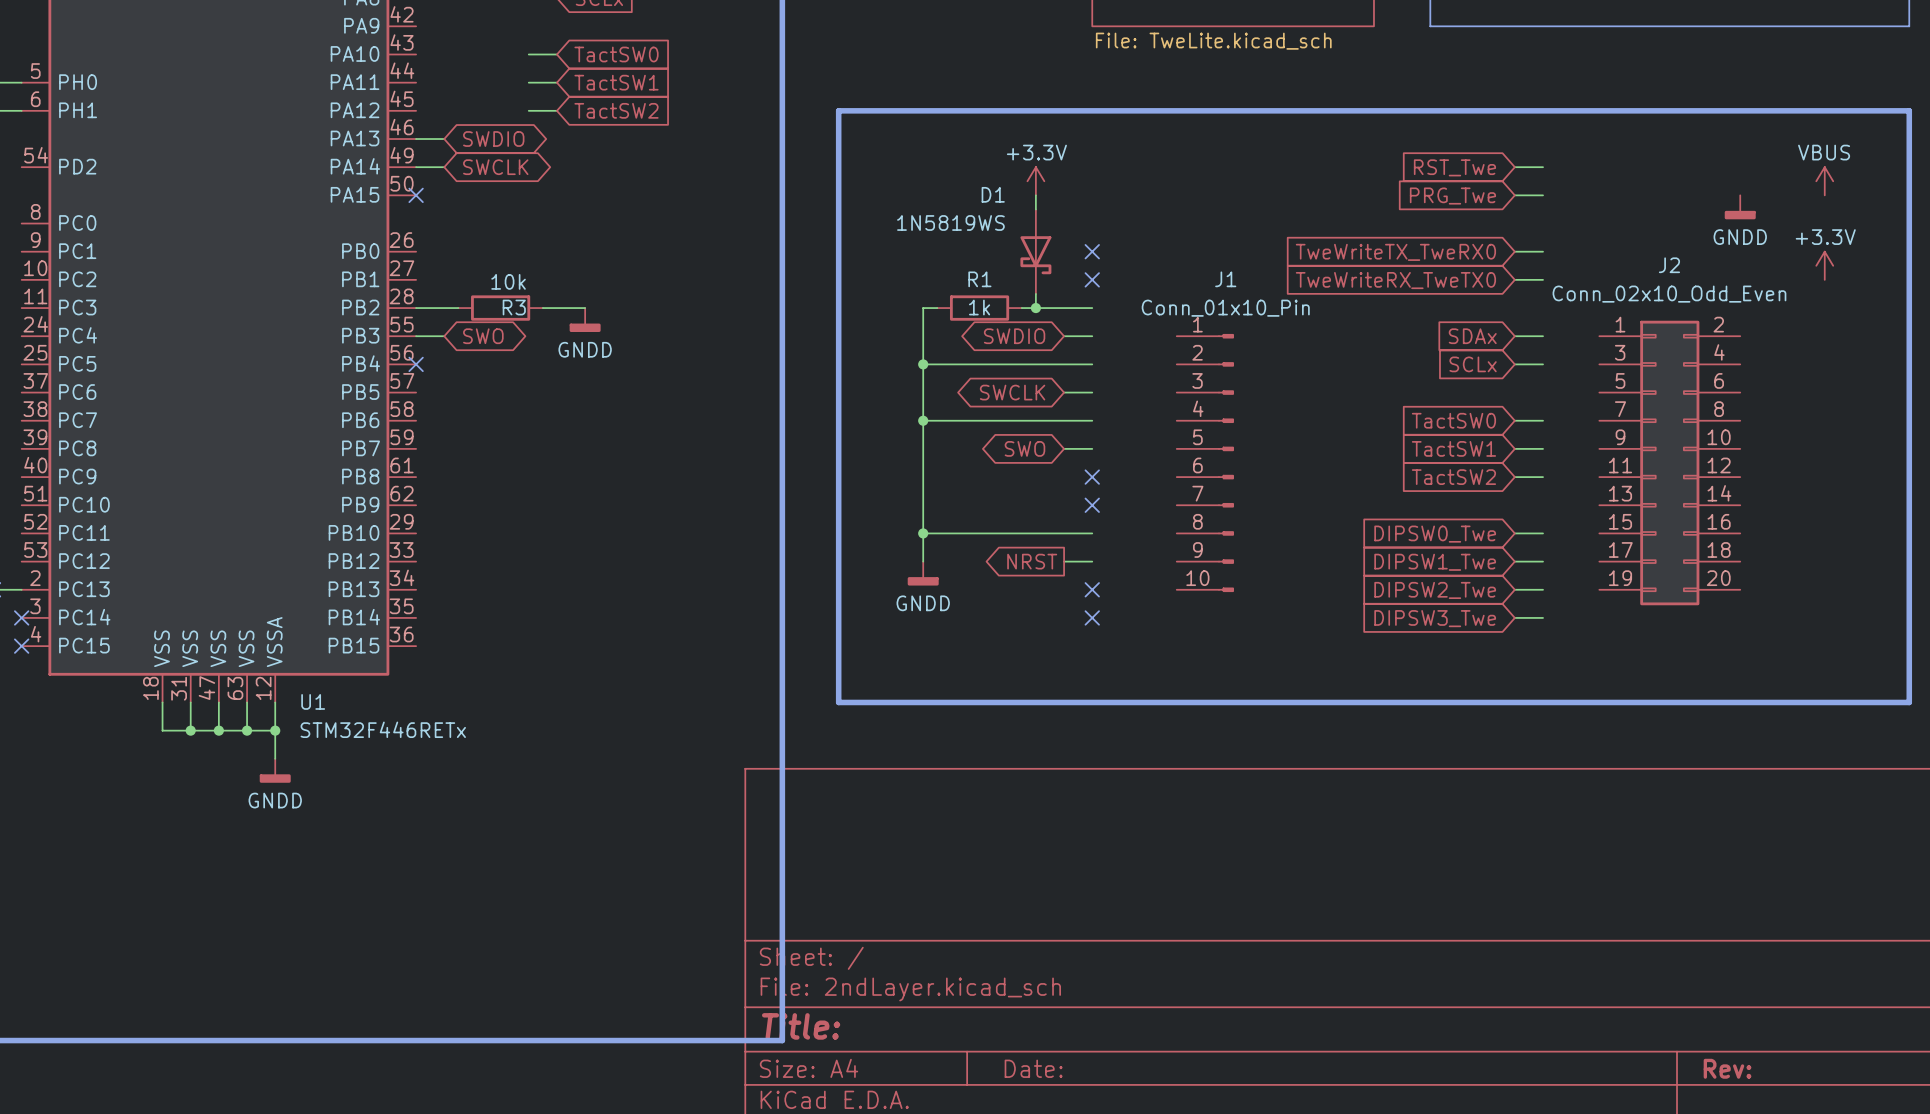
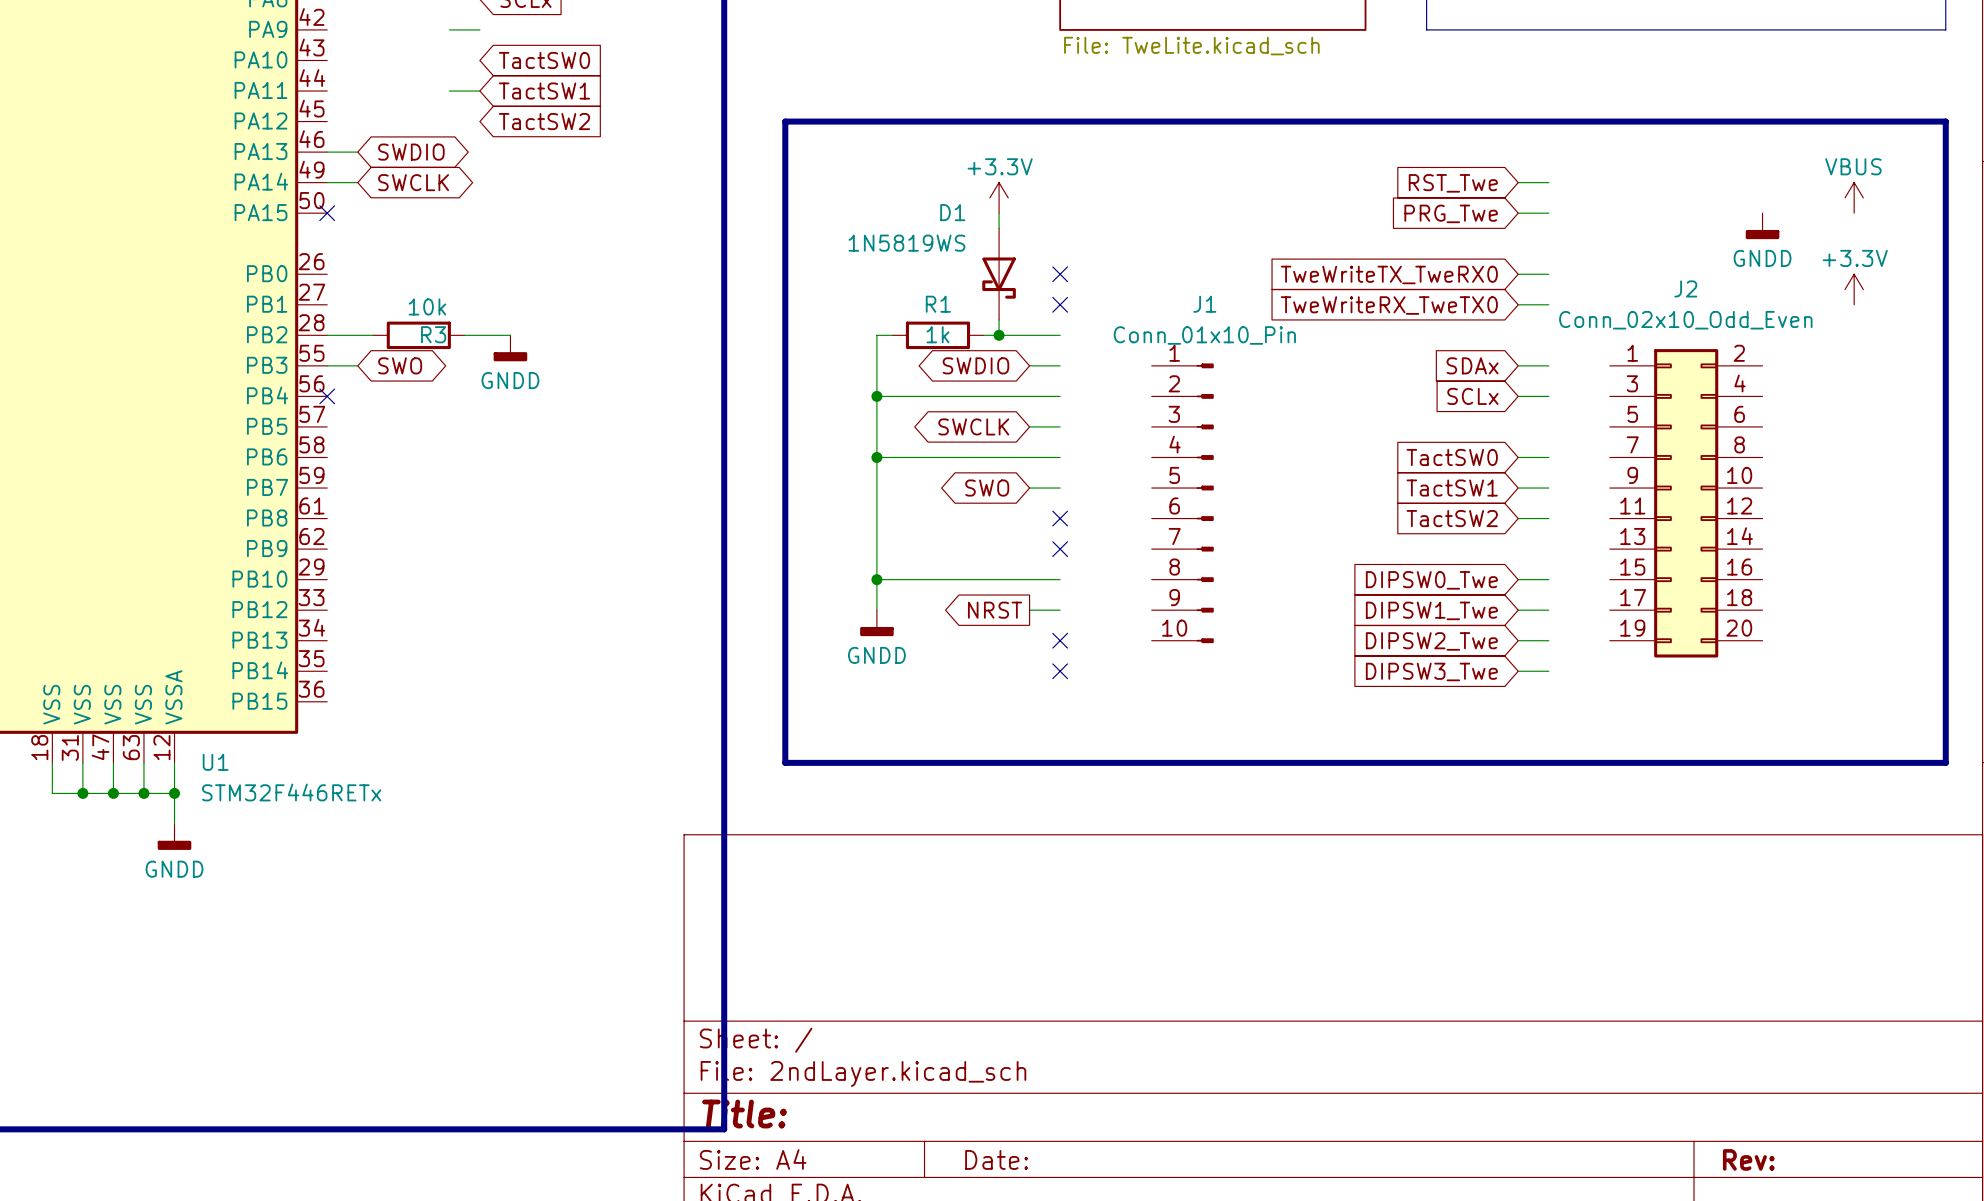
wire: (528, 54) (556, 54) -> (449, 29) (479, 29)
wire: (528, 110) (556, 110) -> none

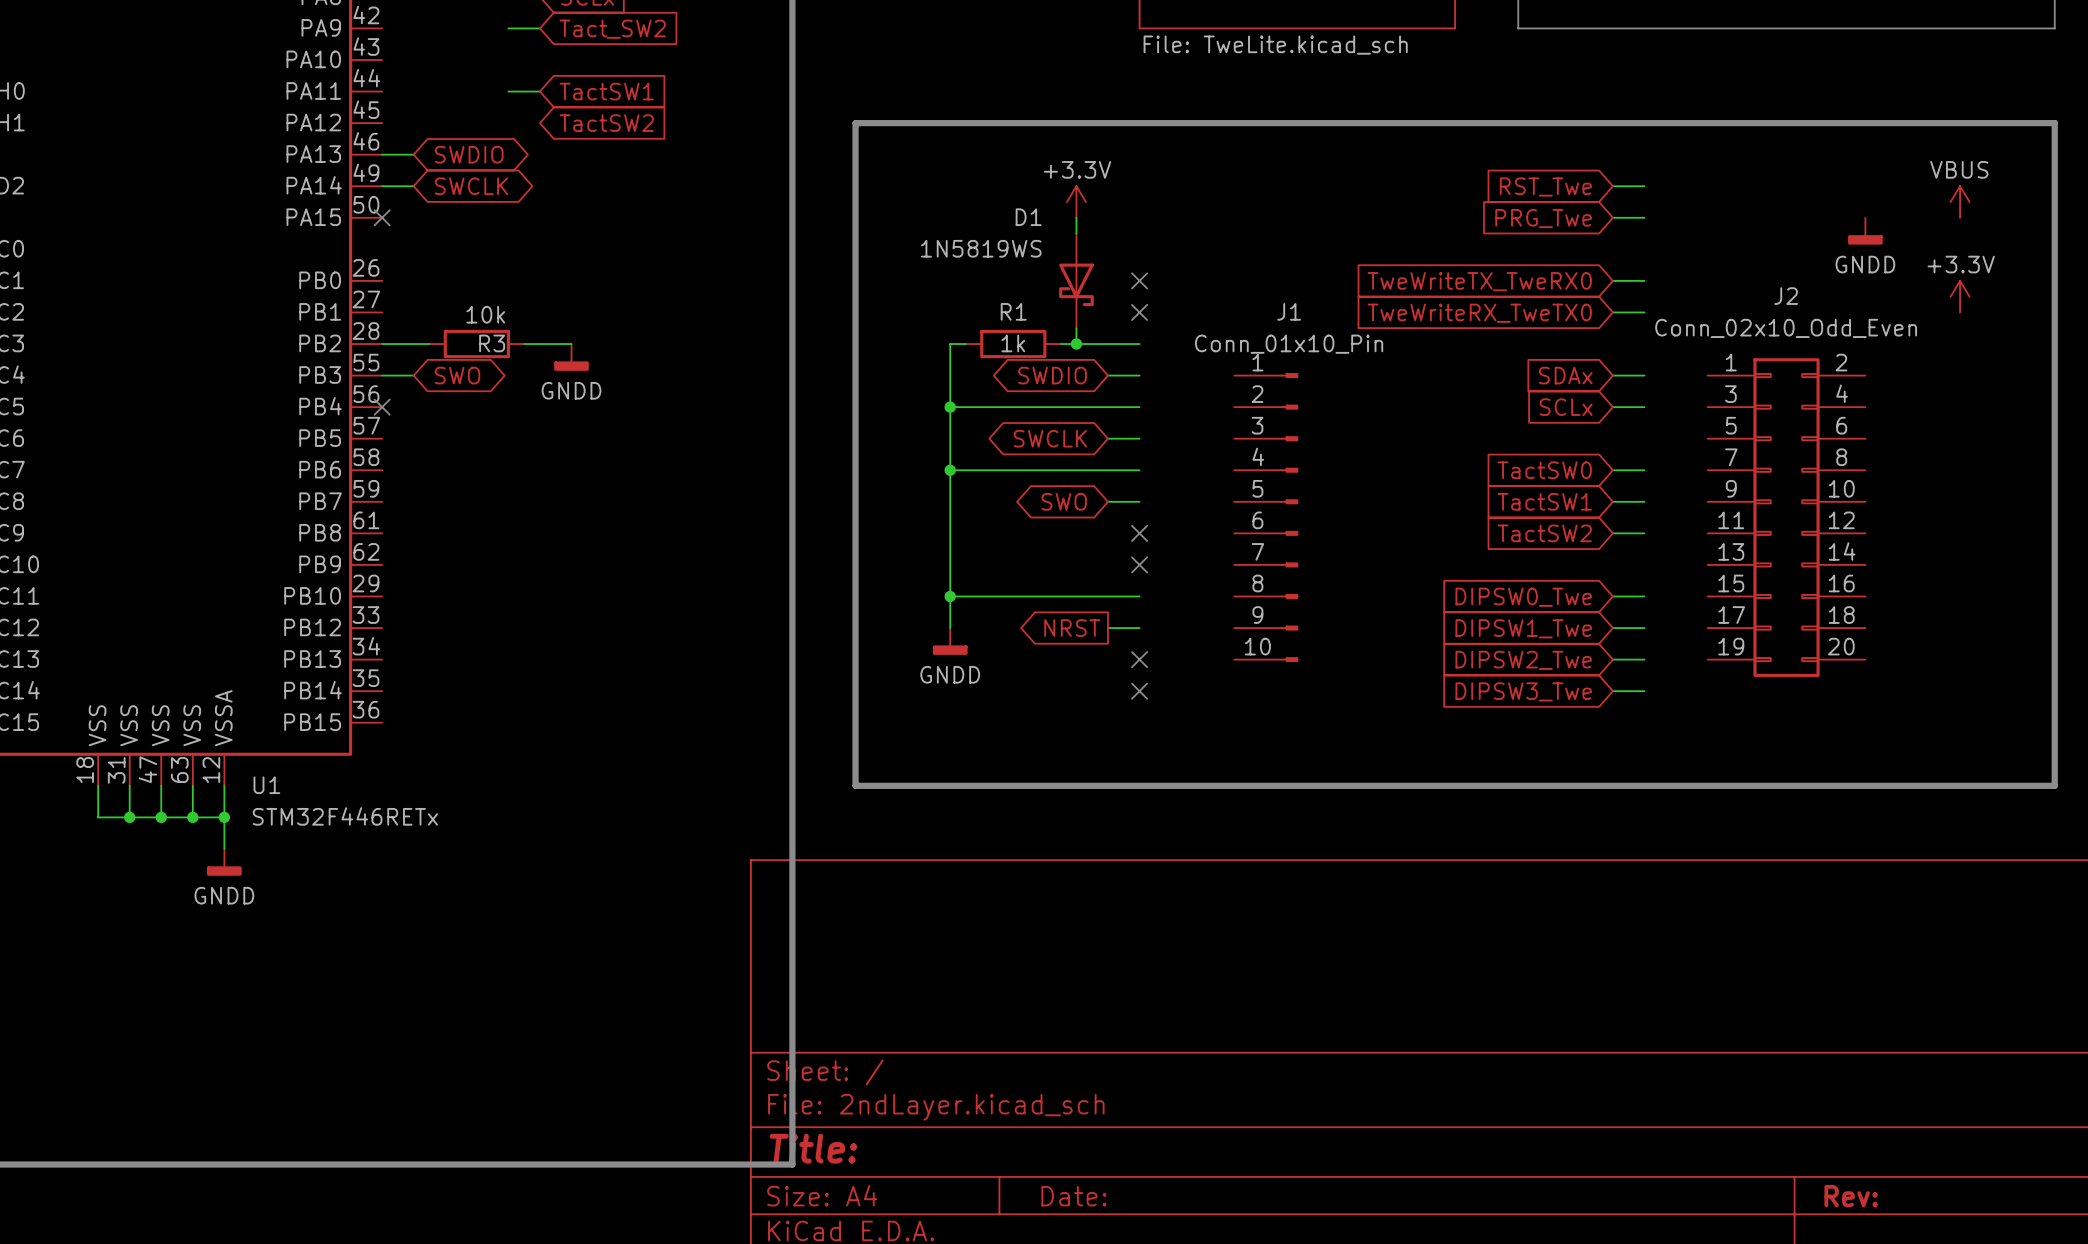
global label: TactSW0 (544, 60) -> Tact_SW2 (612, 29)

